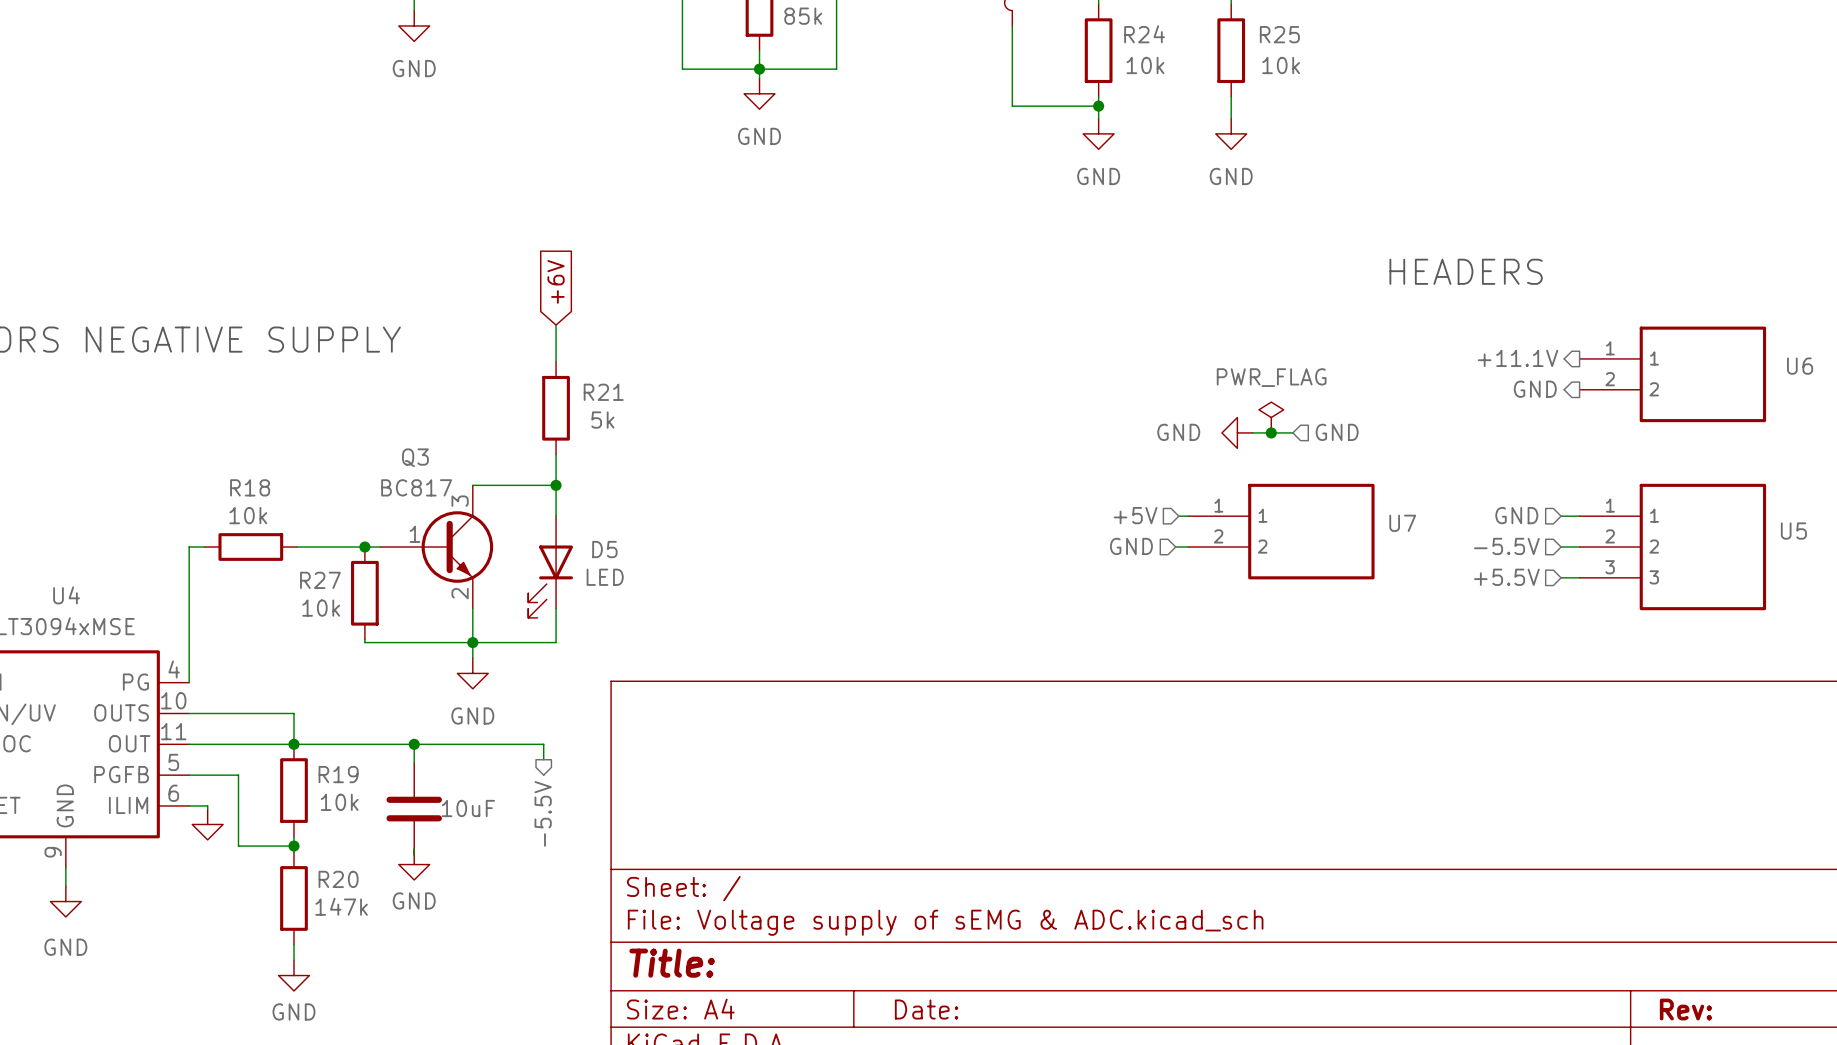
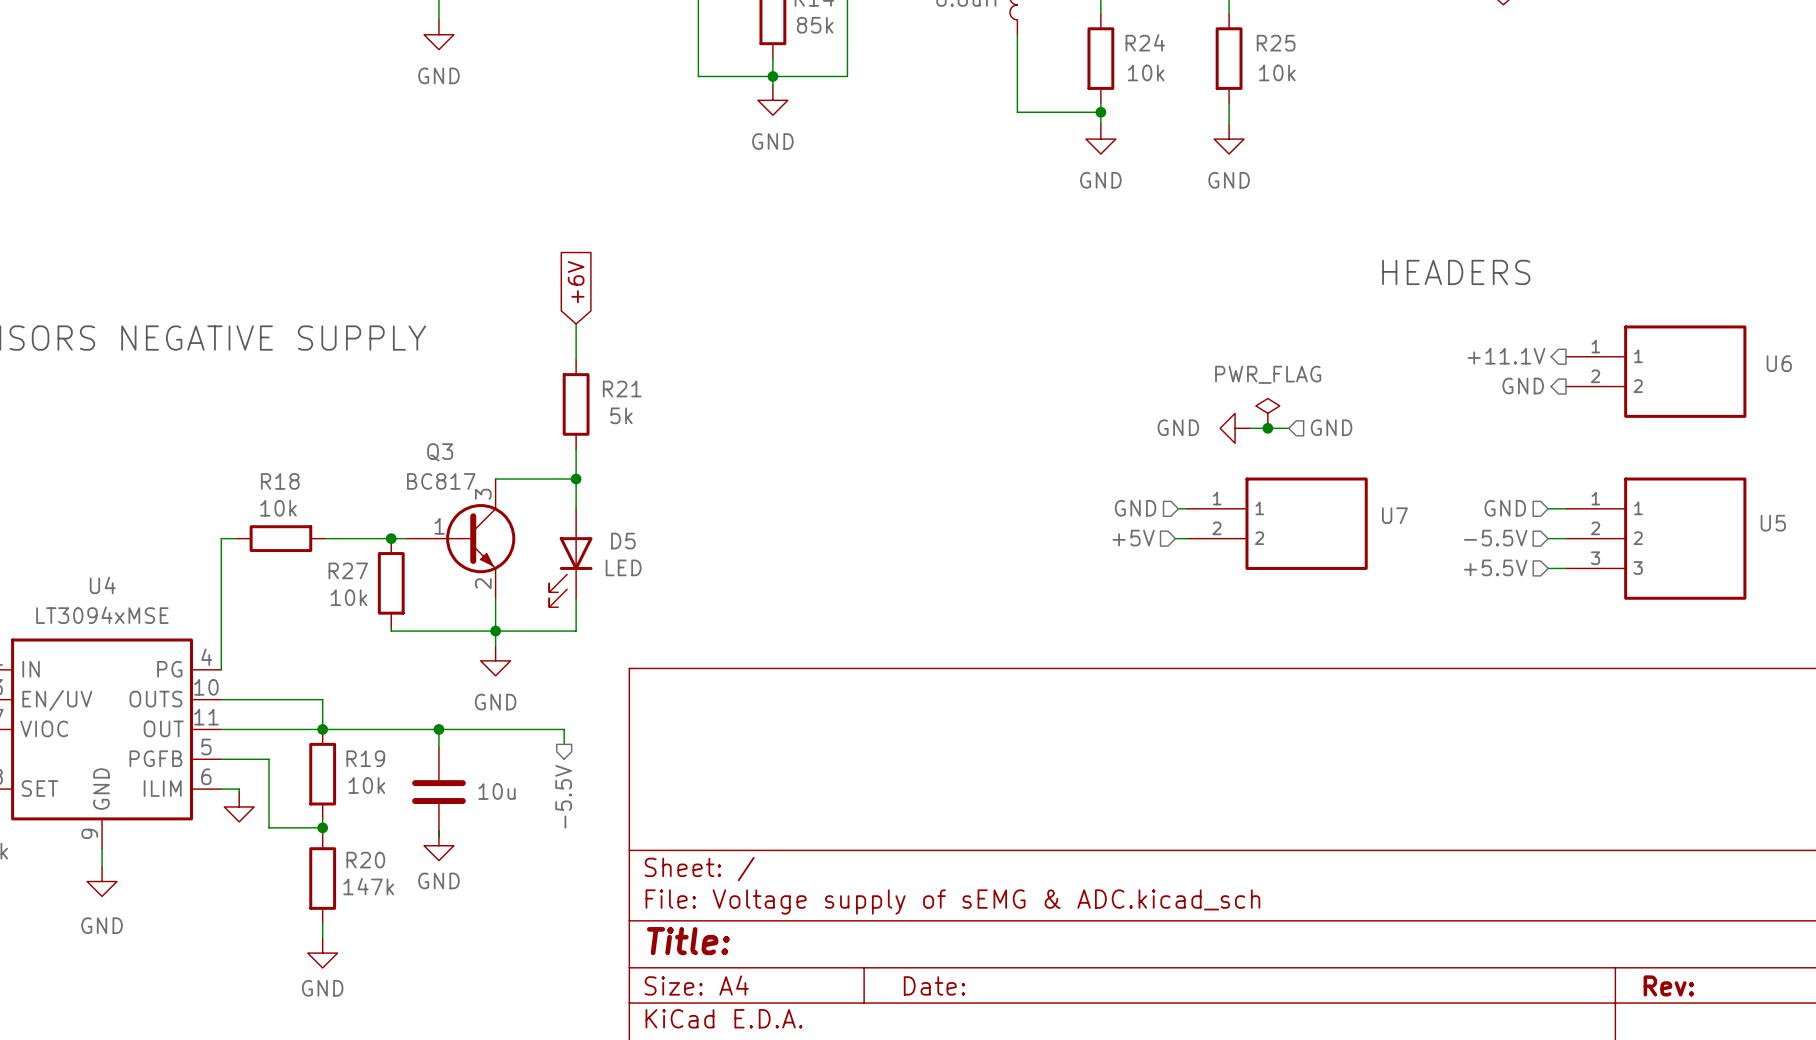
hierarchical label: +5V (1135, 515) -> GND (1135, 508)
hierarchical label: GND (1131, 546) -> +5V (1133, 538)
part value: 10uF (468, 808) -> 10u (496, 791)

